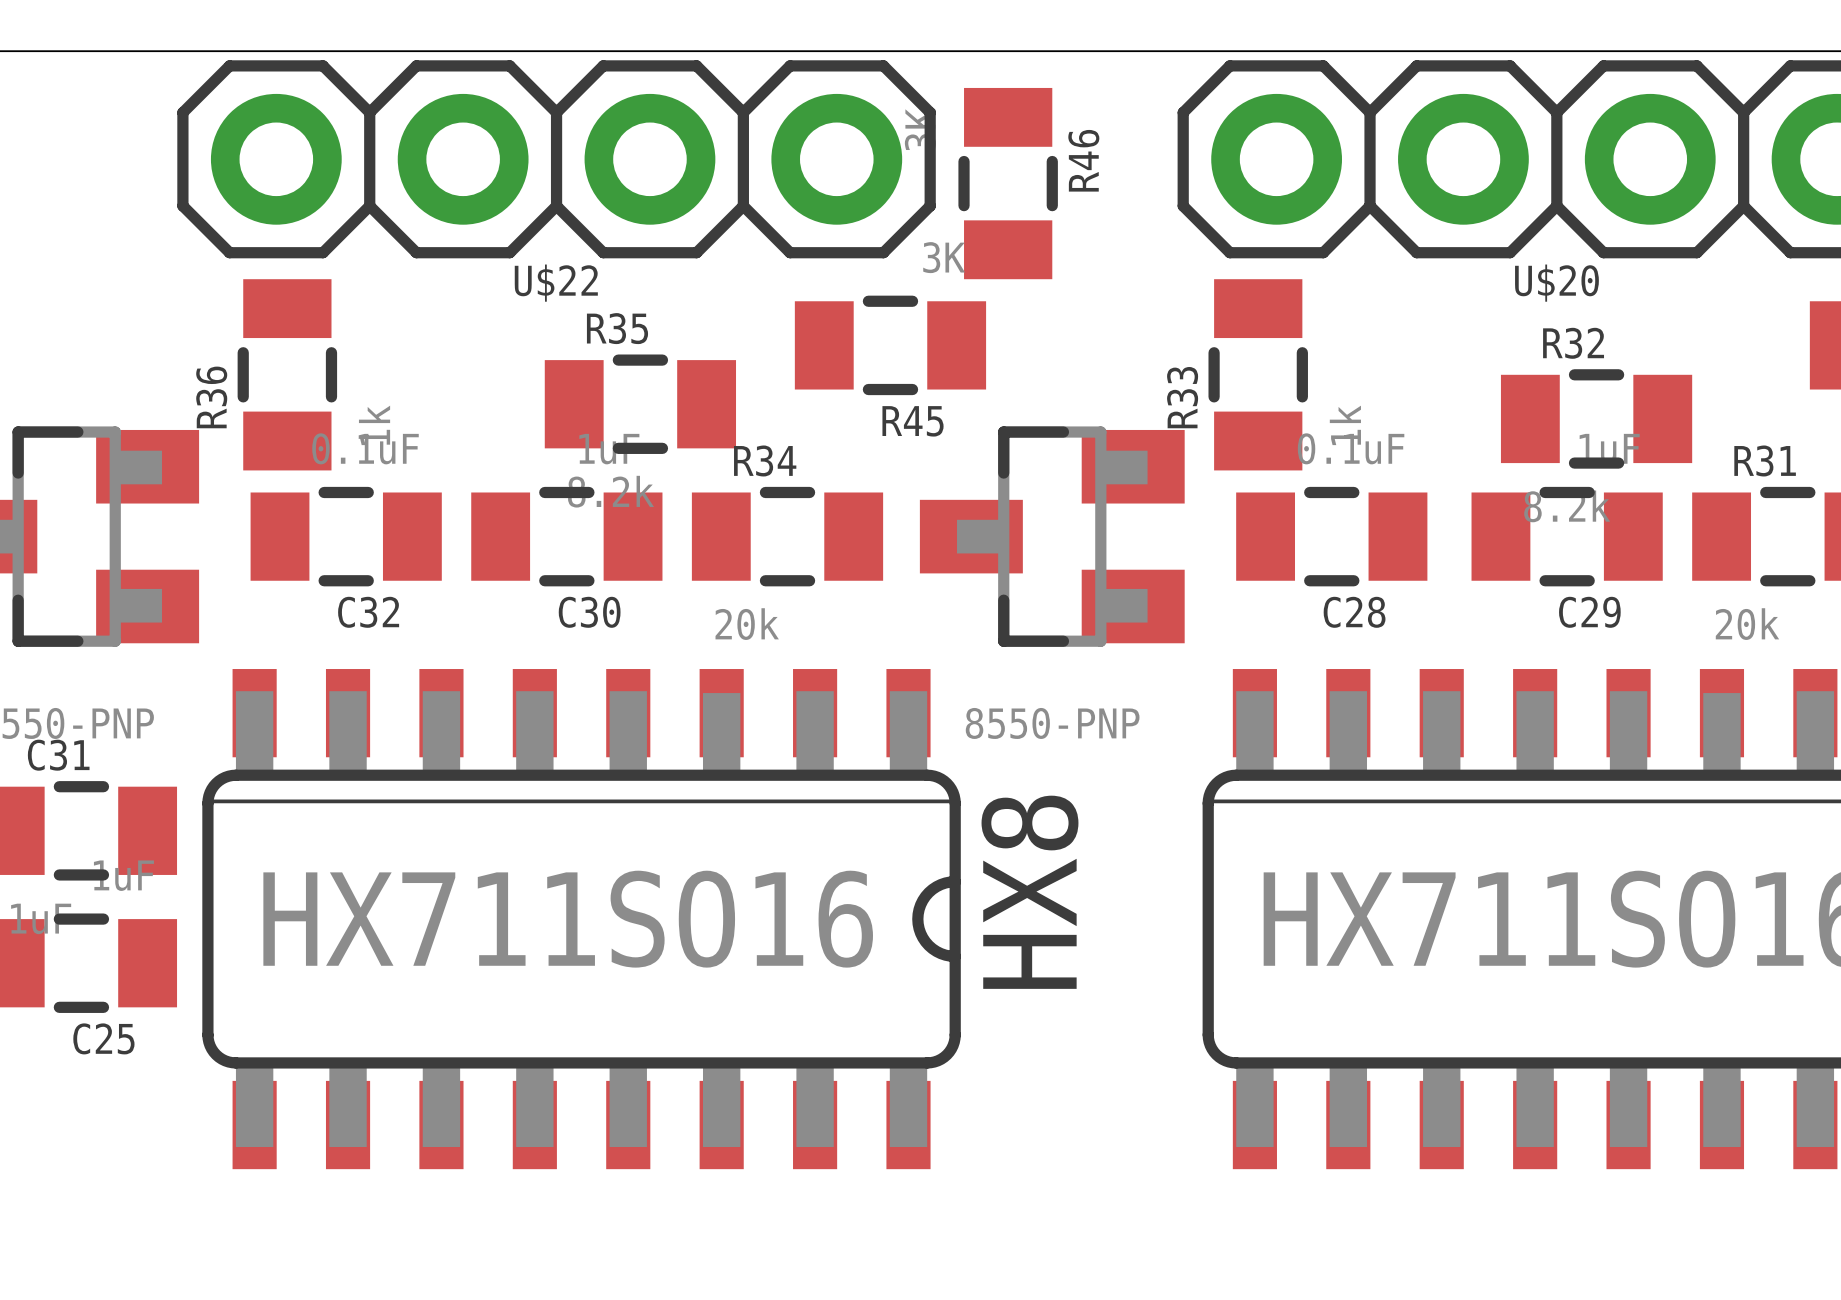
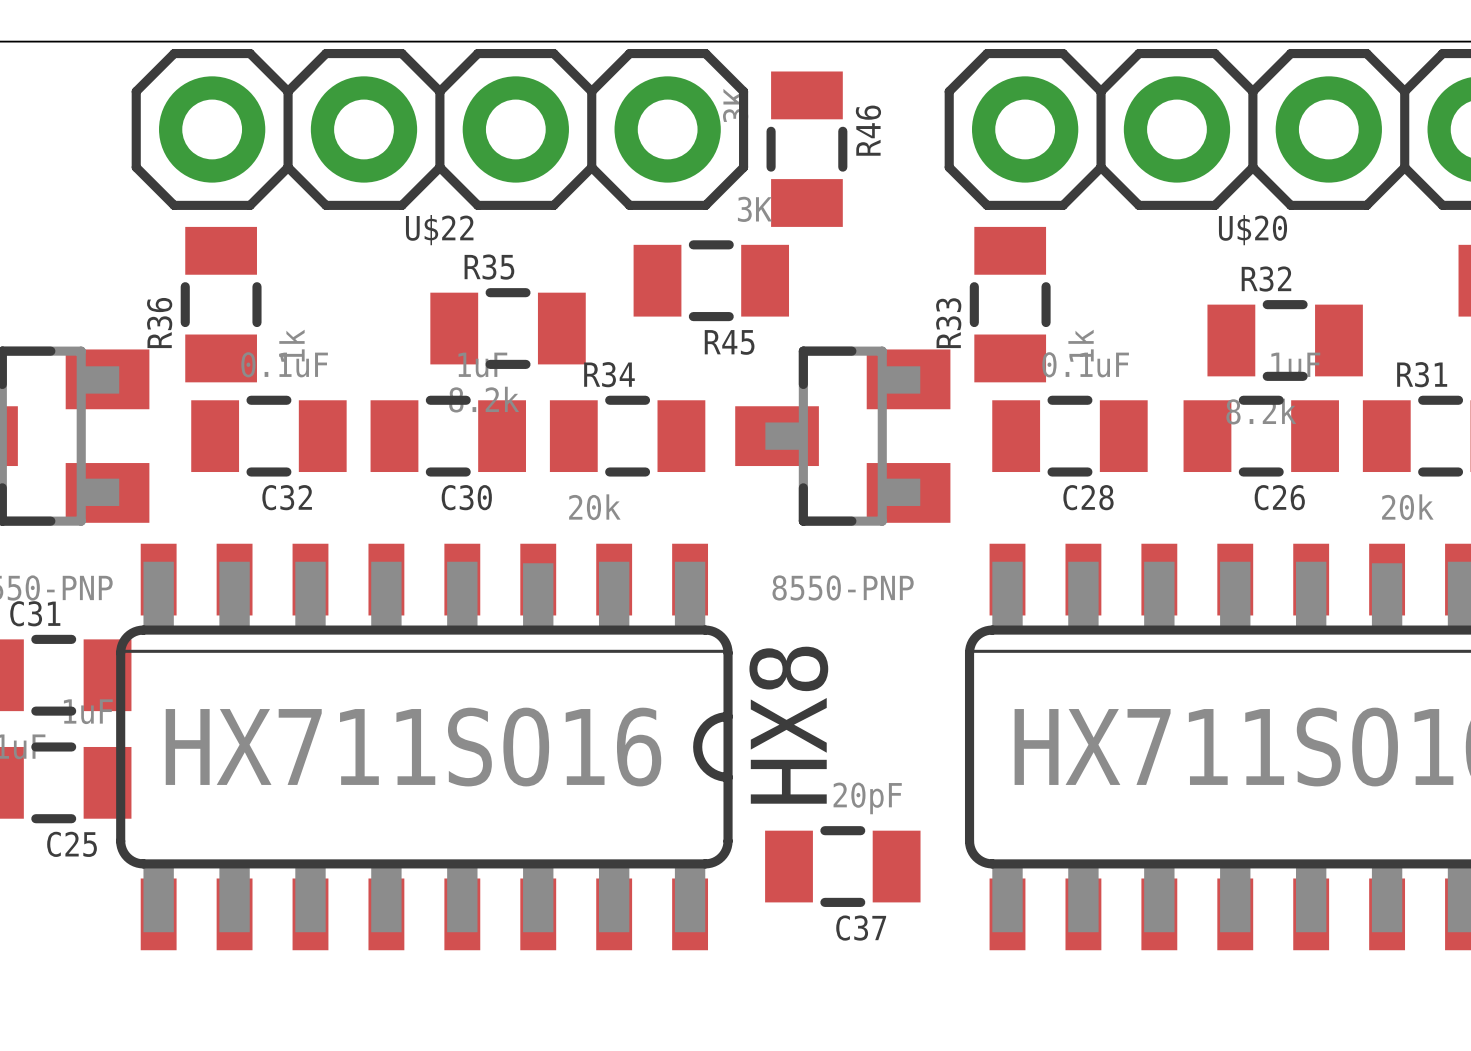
C29 name: C29 (1589, 612) -> C26 (1279, 497)
HX8 position: (581, 919) -> (424, 746)
C37: none -> 20pF (842, 866)

